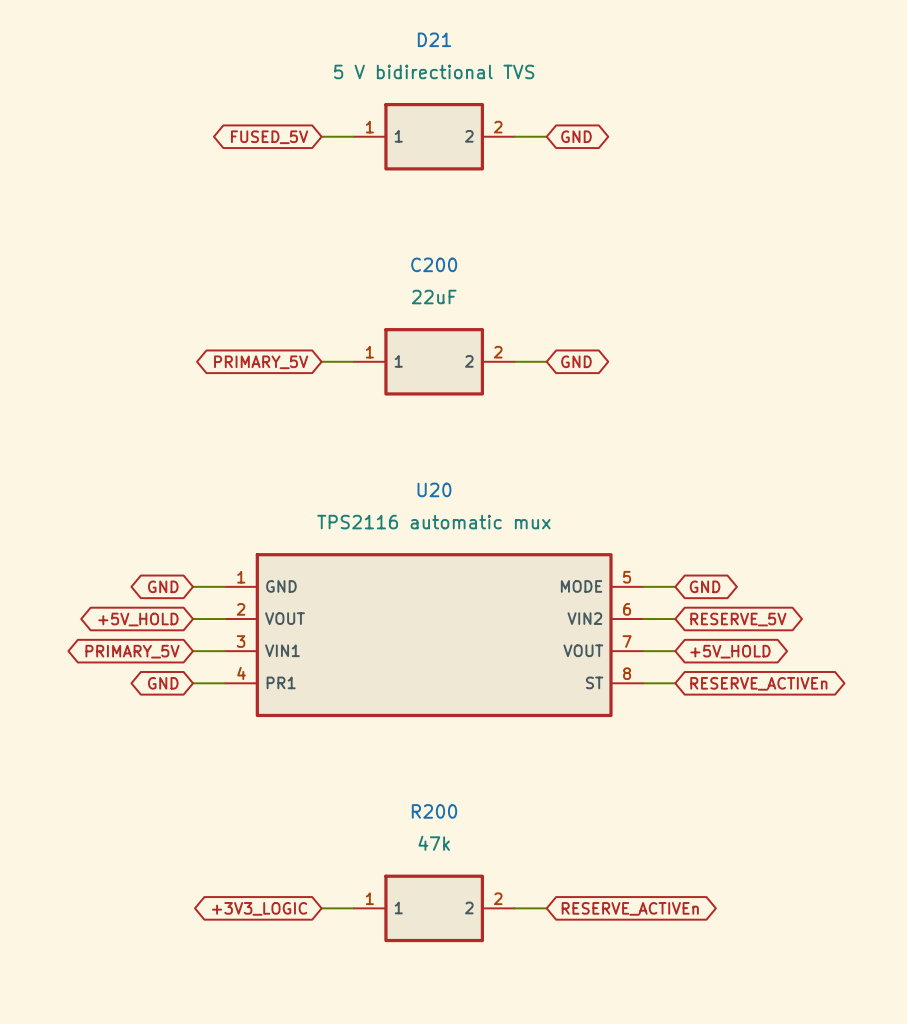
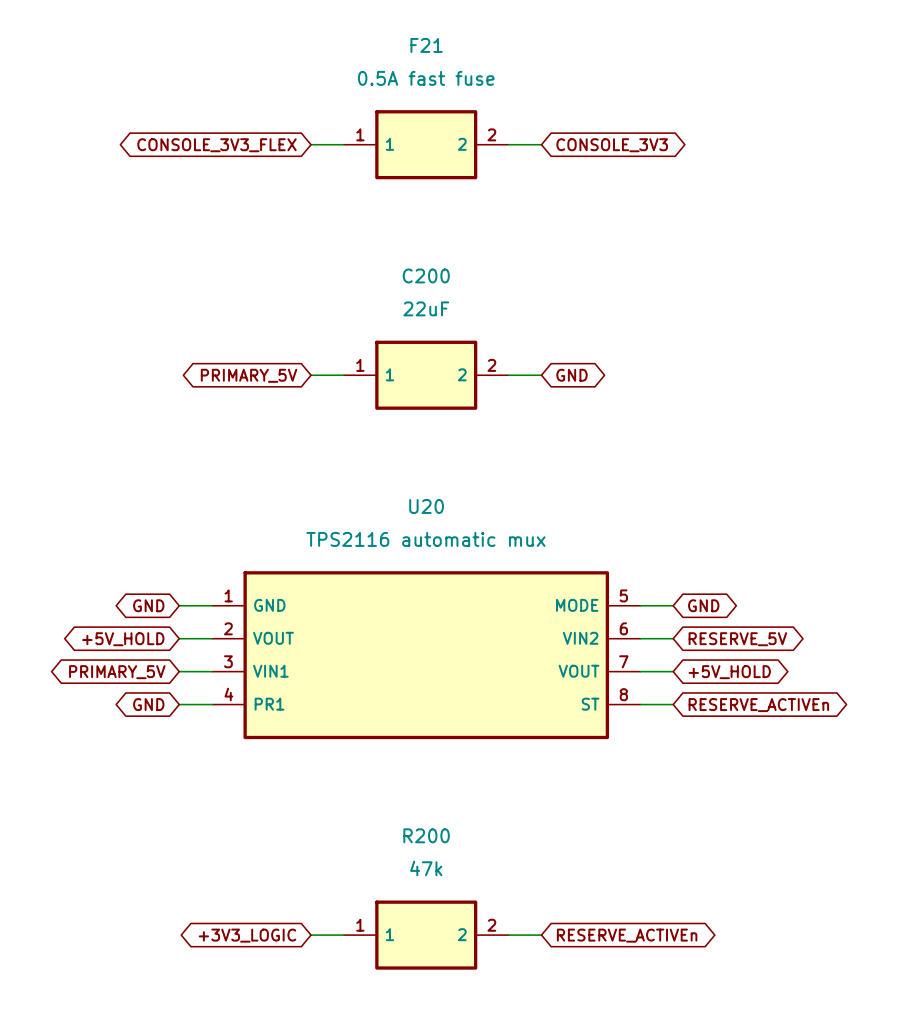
D21 name: D21 (434, 39) -> F21 (426, 45)
D21 value: 5 V bidirectional TVS (434, 71) -> 0.5A fast fuse (426, 78)
global label: GND (576, 136) -> CONSOLE_3V3 (612, 145)
global label: FUSED_5V (269, 137) -> CONSOLE_3V3_FLEX (217, 145)

